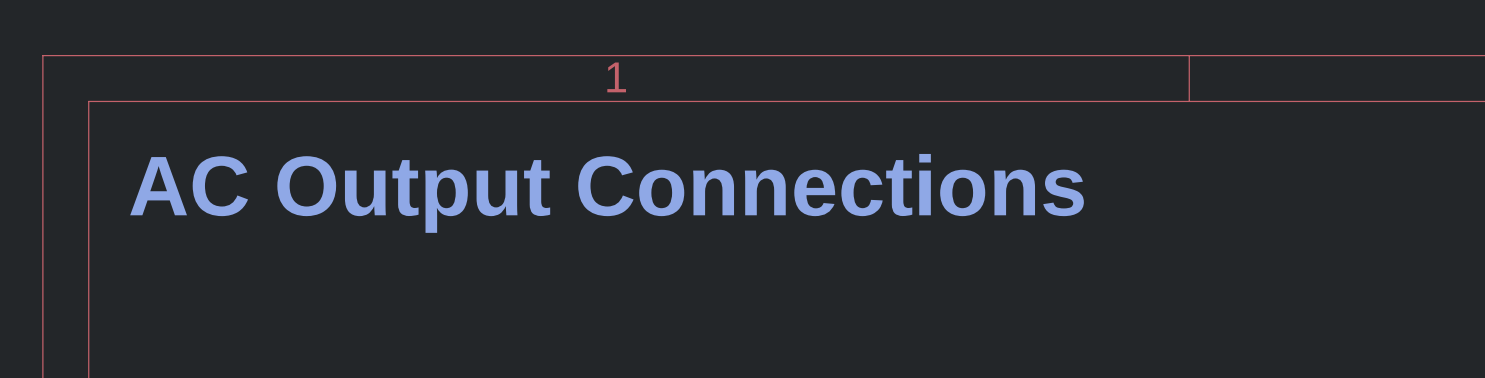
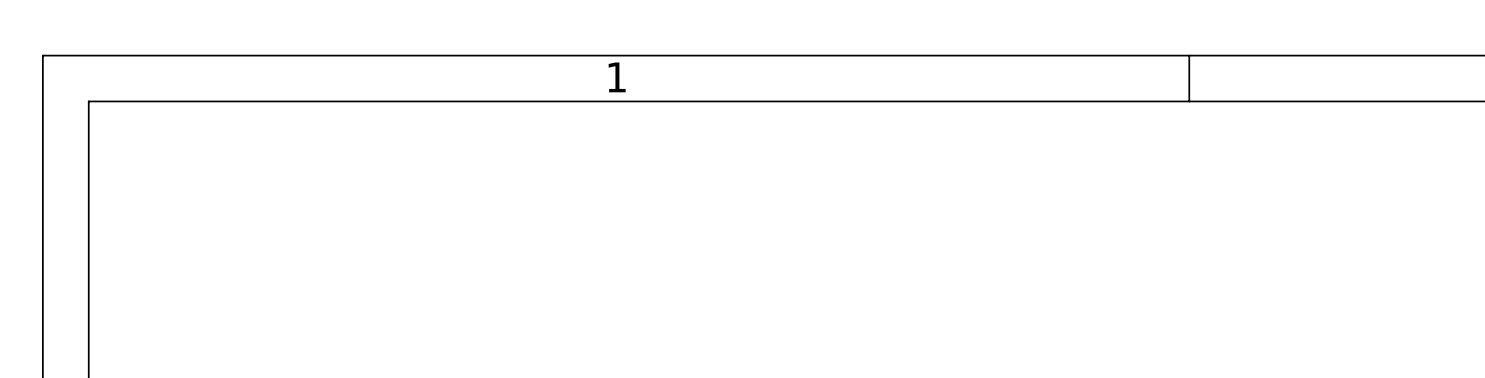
text: AC Output Connections (607, 193) -> none

